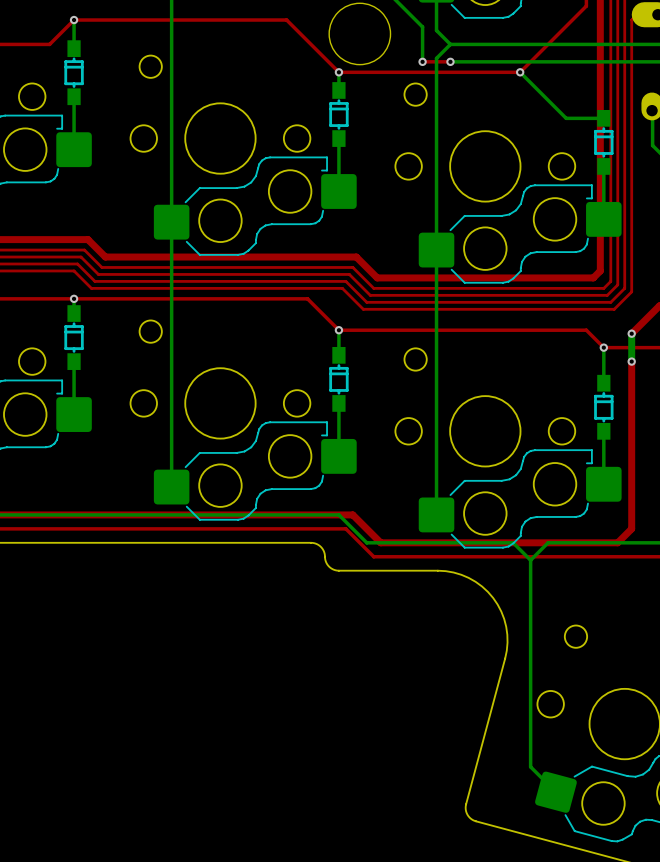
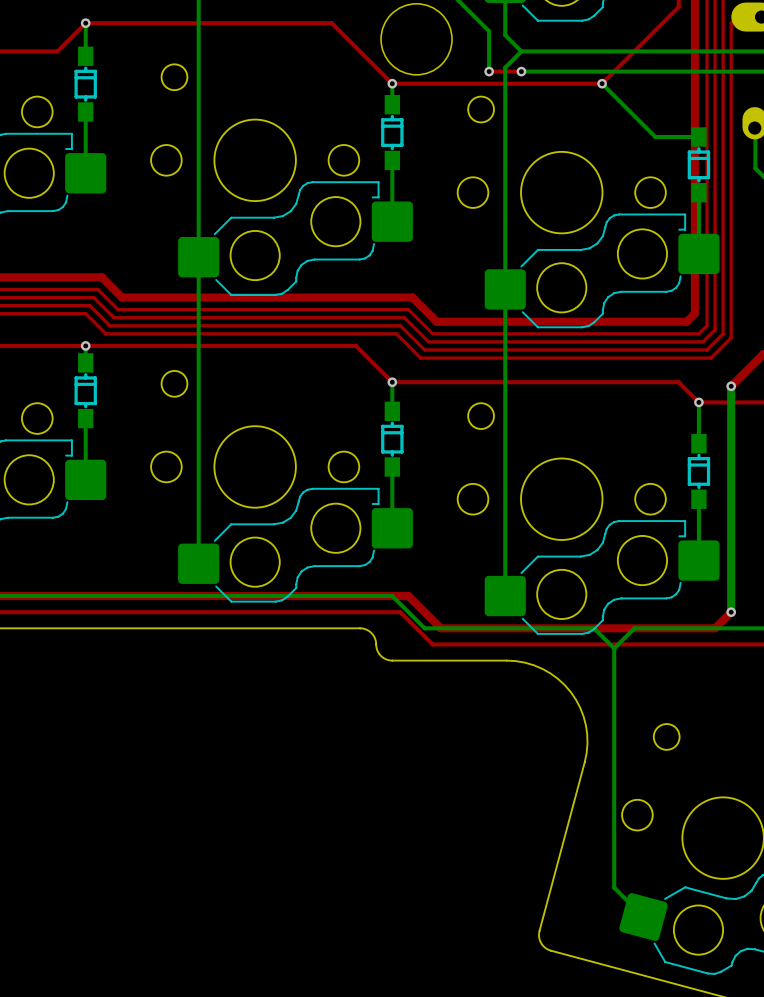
bottom track: none -> (731, 418) (731, 612)
top track: (631, 361) (631, 528) -> none
via: (631, 361) -> none
via: none -> (731, 612)

